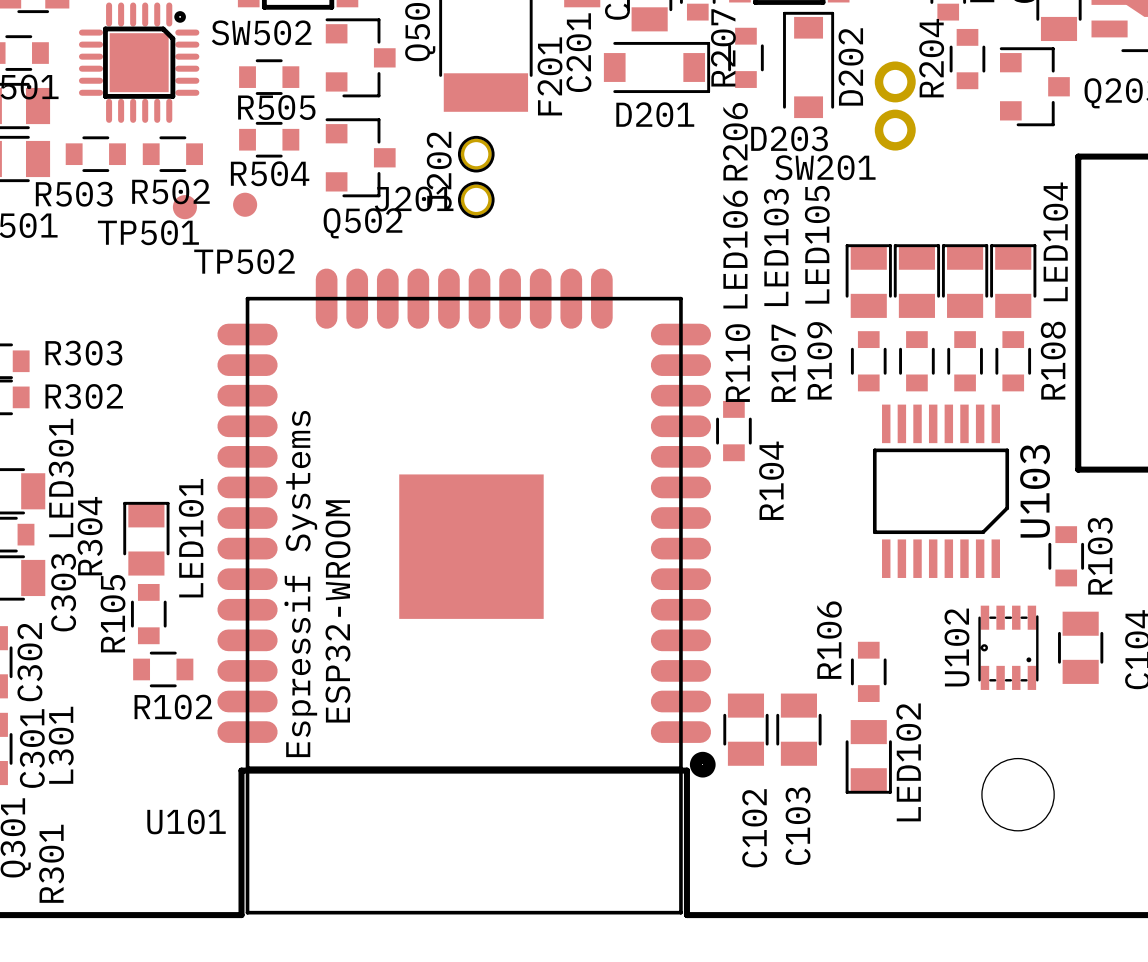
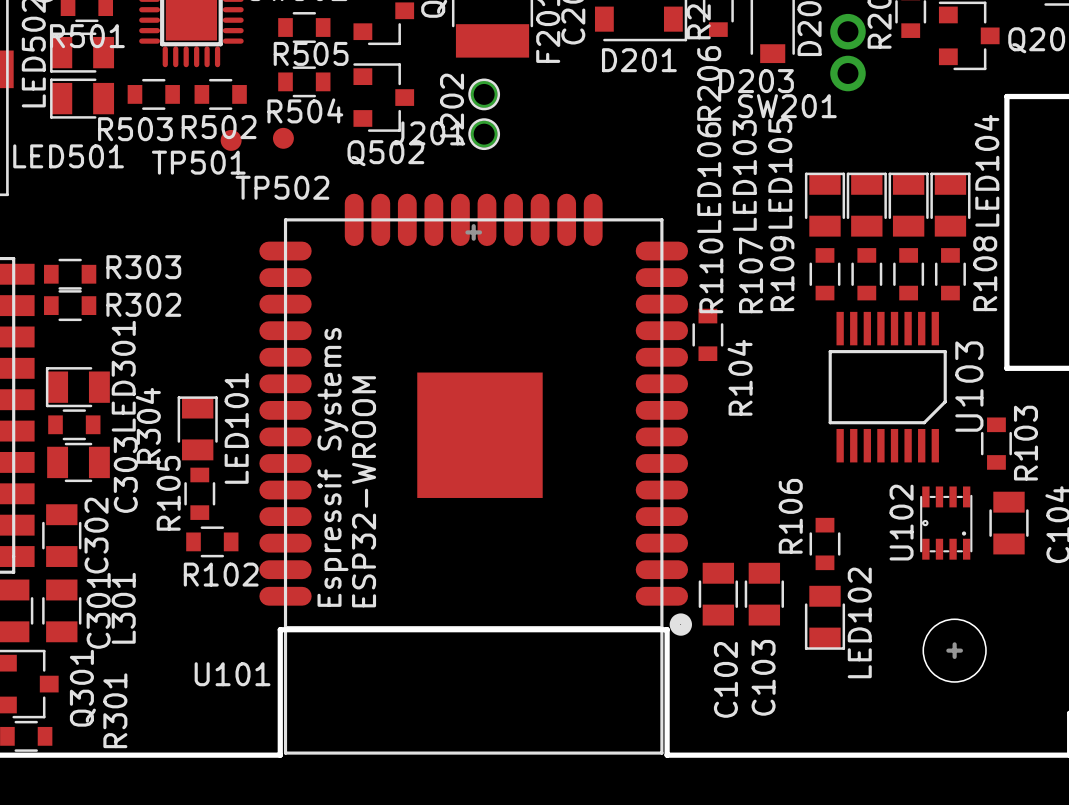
line: none -> (473, 226) (473, 238)
line: none -> (467, 232) (479, 232)
line: none -> (954, 644) (954, 656)
line: none -> (948, 650) (960, 650)

